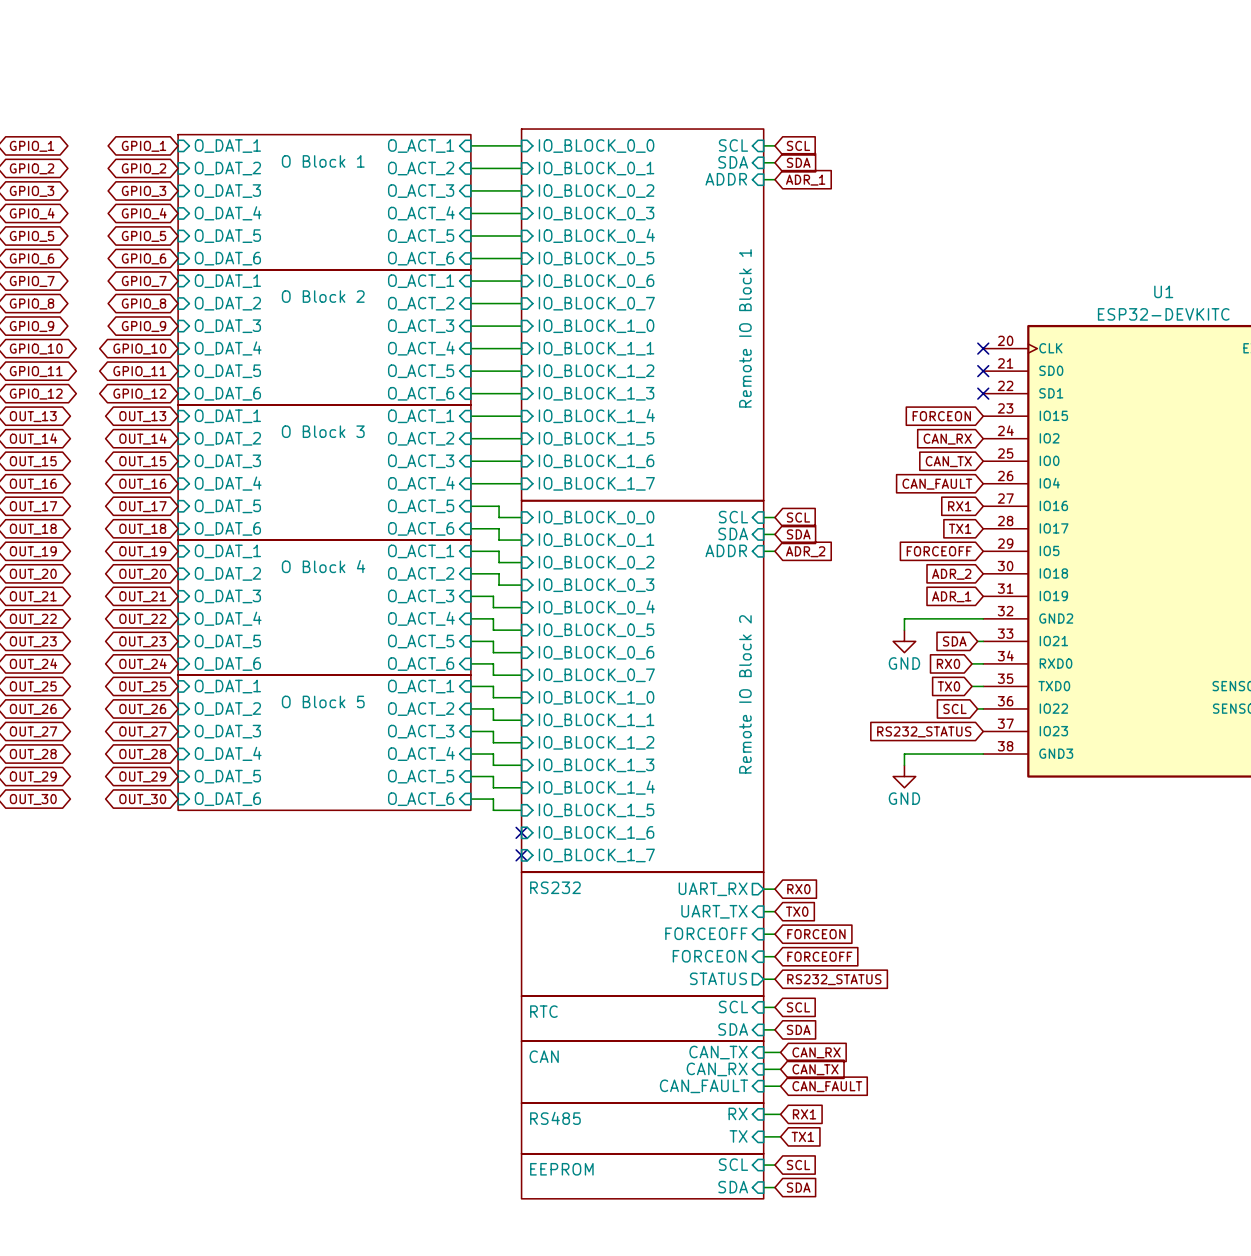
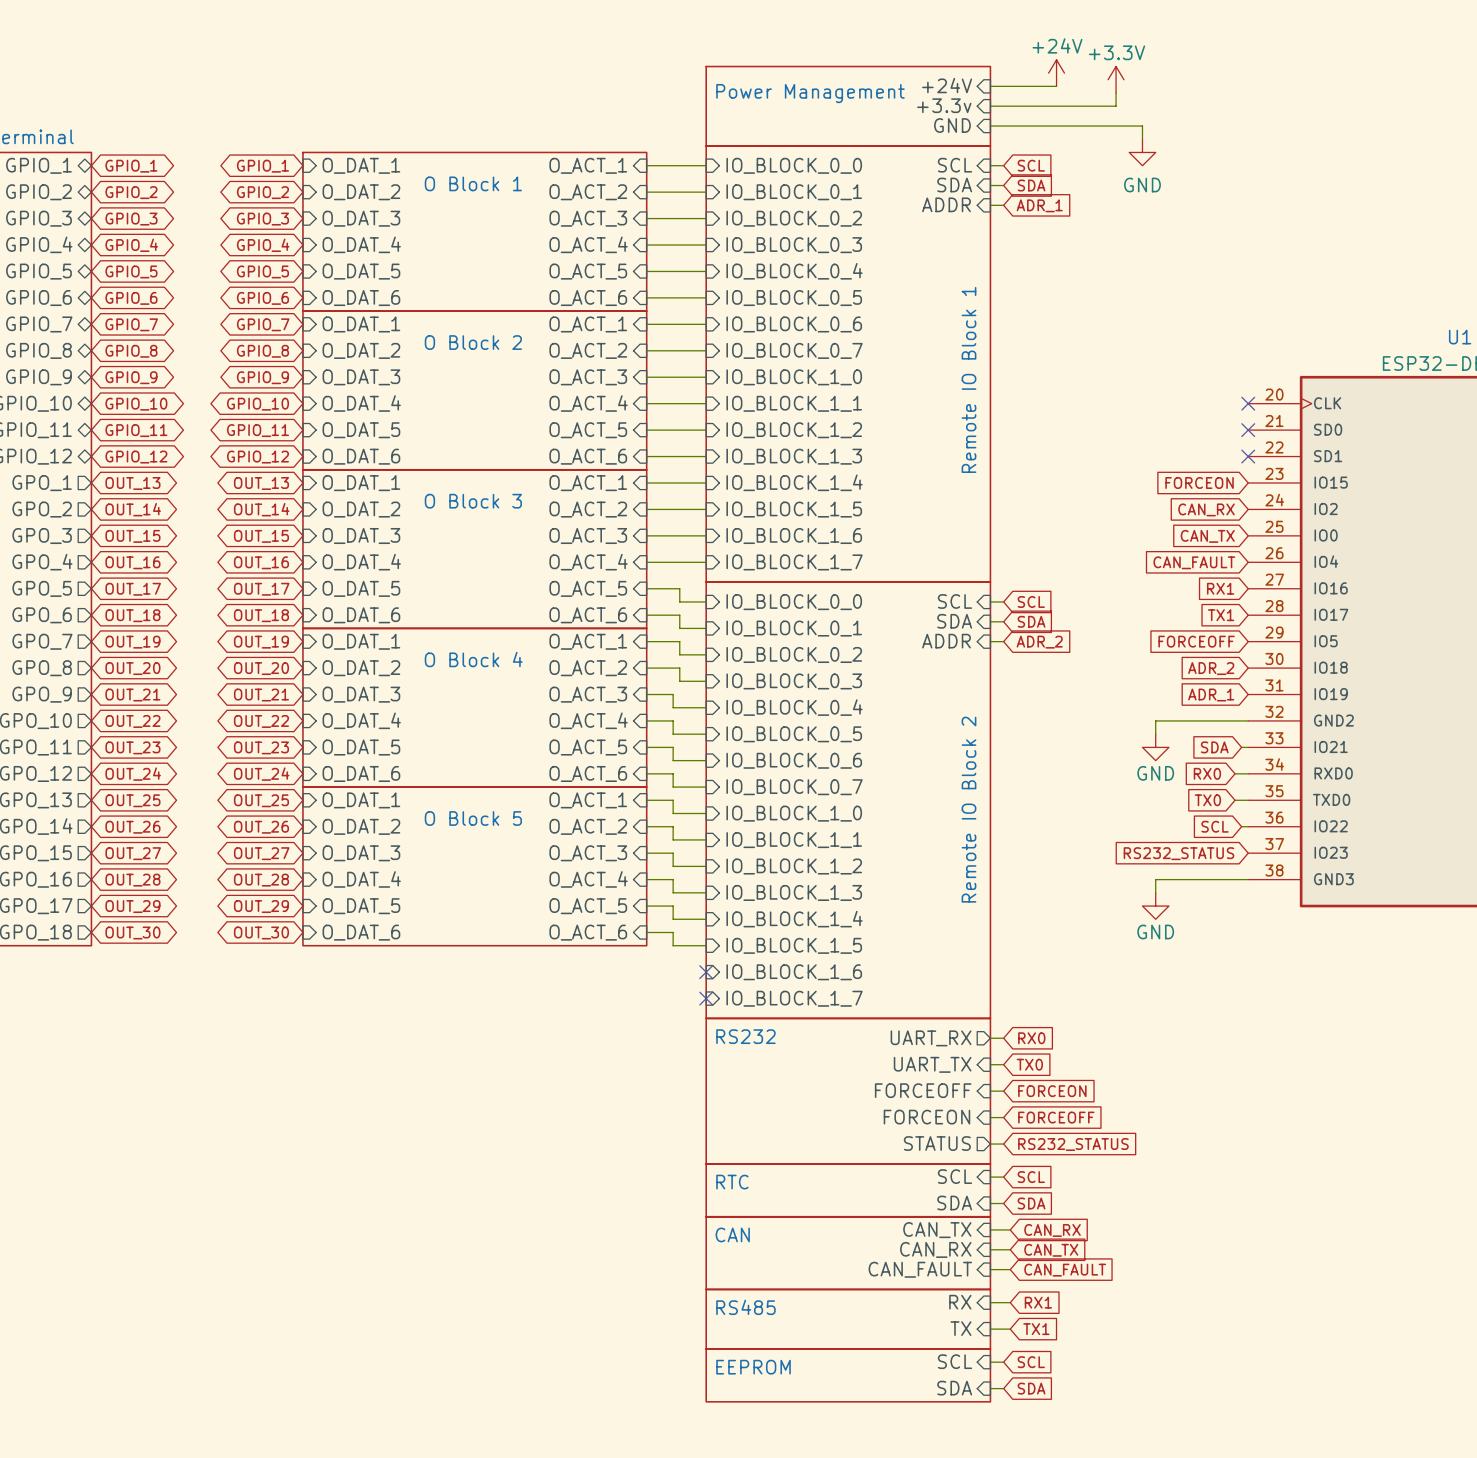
power symbol: none -> +24V (1056, 73)
power symbol: none -> +3.3V (1116, 79)
sheet pin: none -> +24V (947, 85)
wire: none -> (990, 86) (1056, 86)
wire: none -> (1116, 92) (1116, 106) (990, 106)
sheet pin: none -> +3.3v (944, 105)
sheet Power Management: none -> (848, 106)
sheet pin: none -> GND (952, 125)
wire: none -> (990, 126) (1142, 126) (1142, 139)
power symbol: none -> GND (1142, 152)

